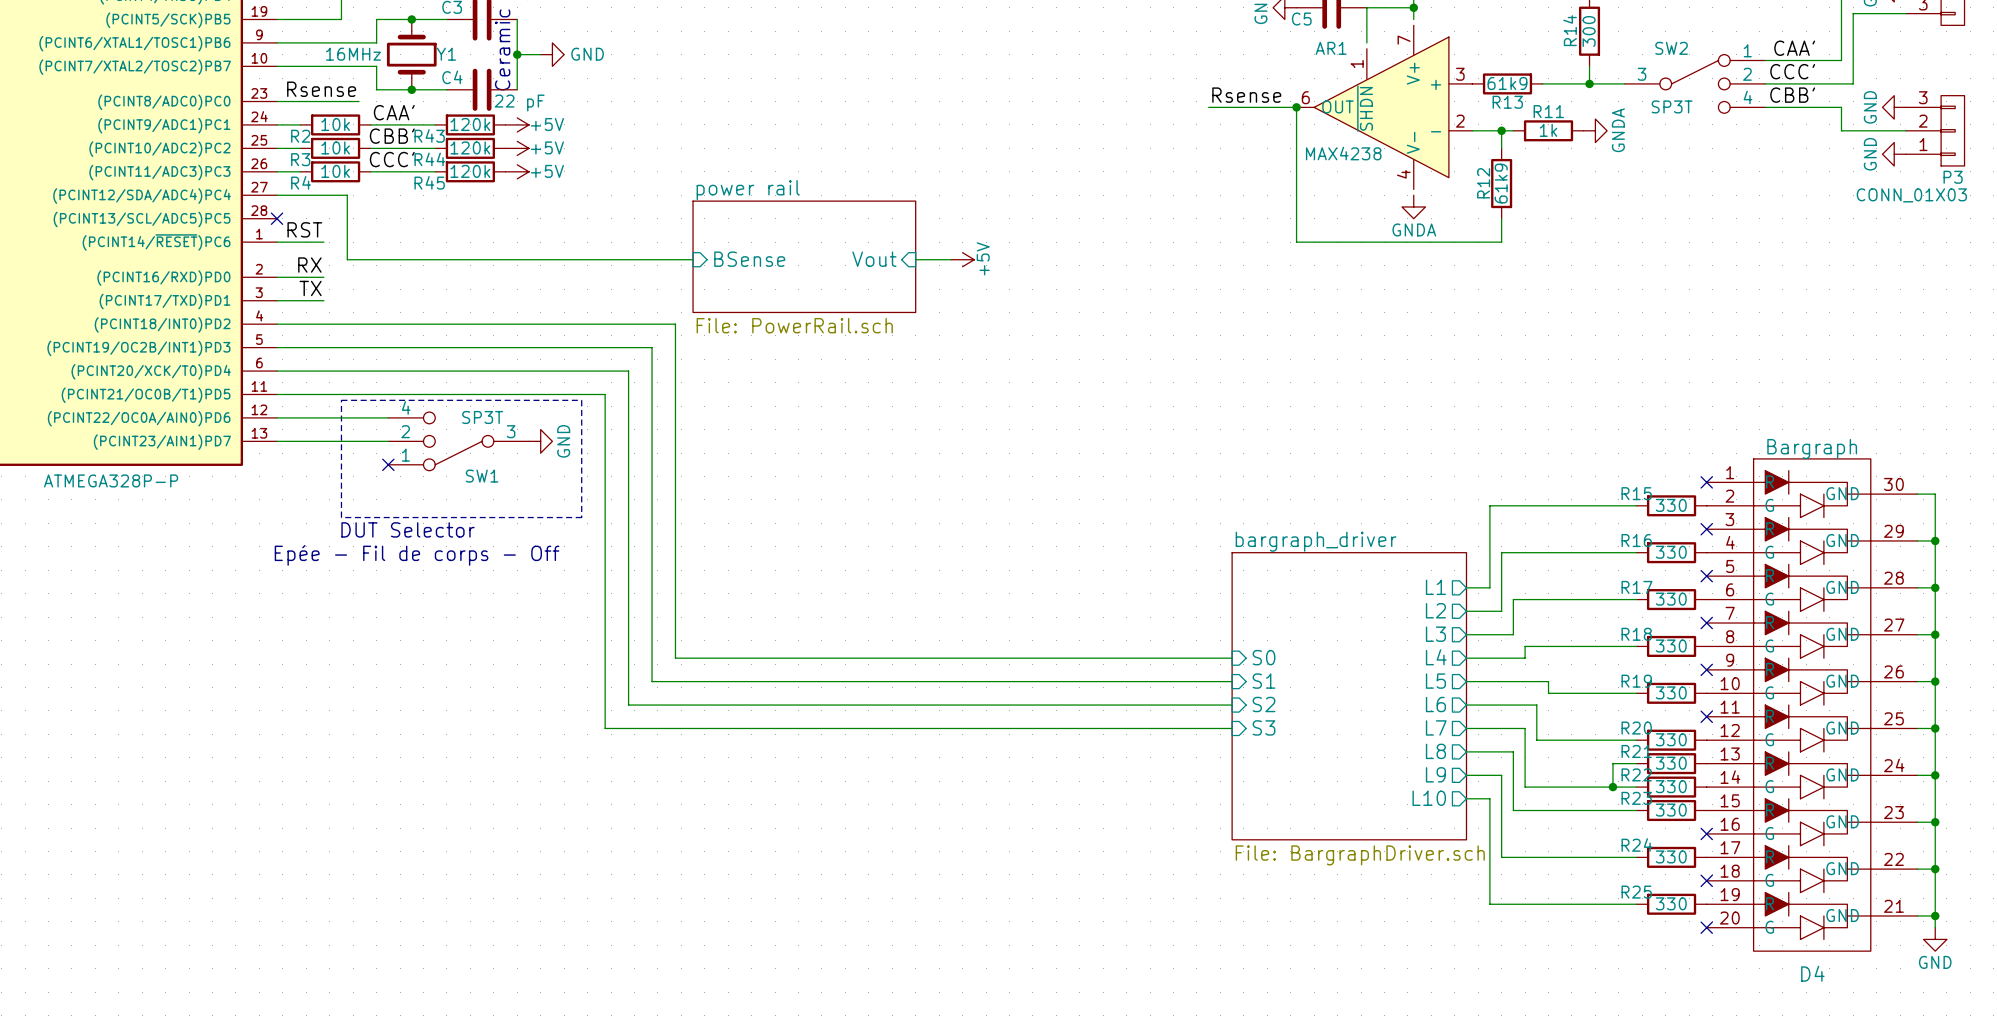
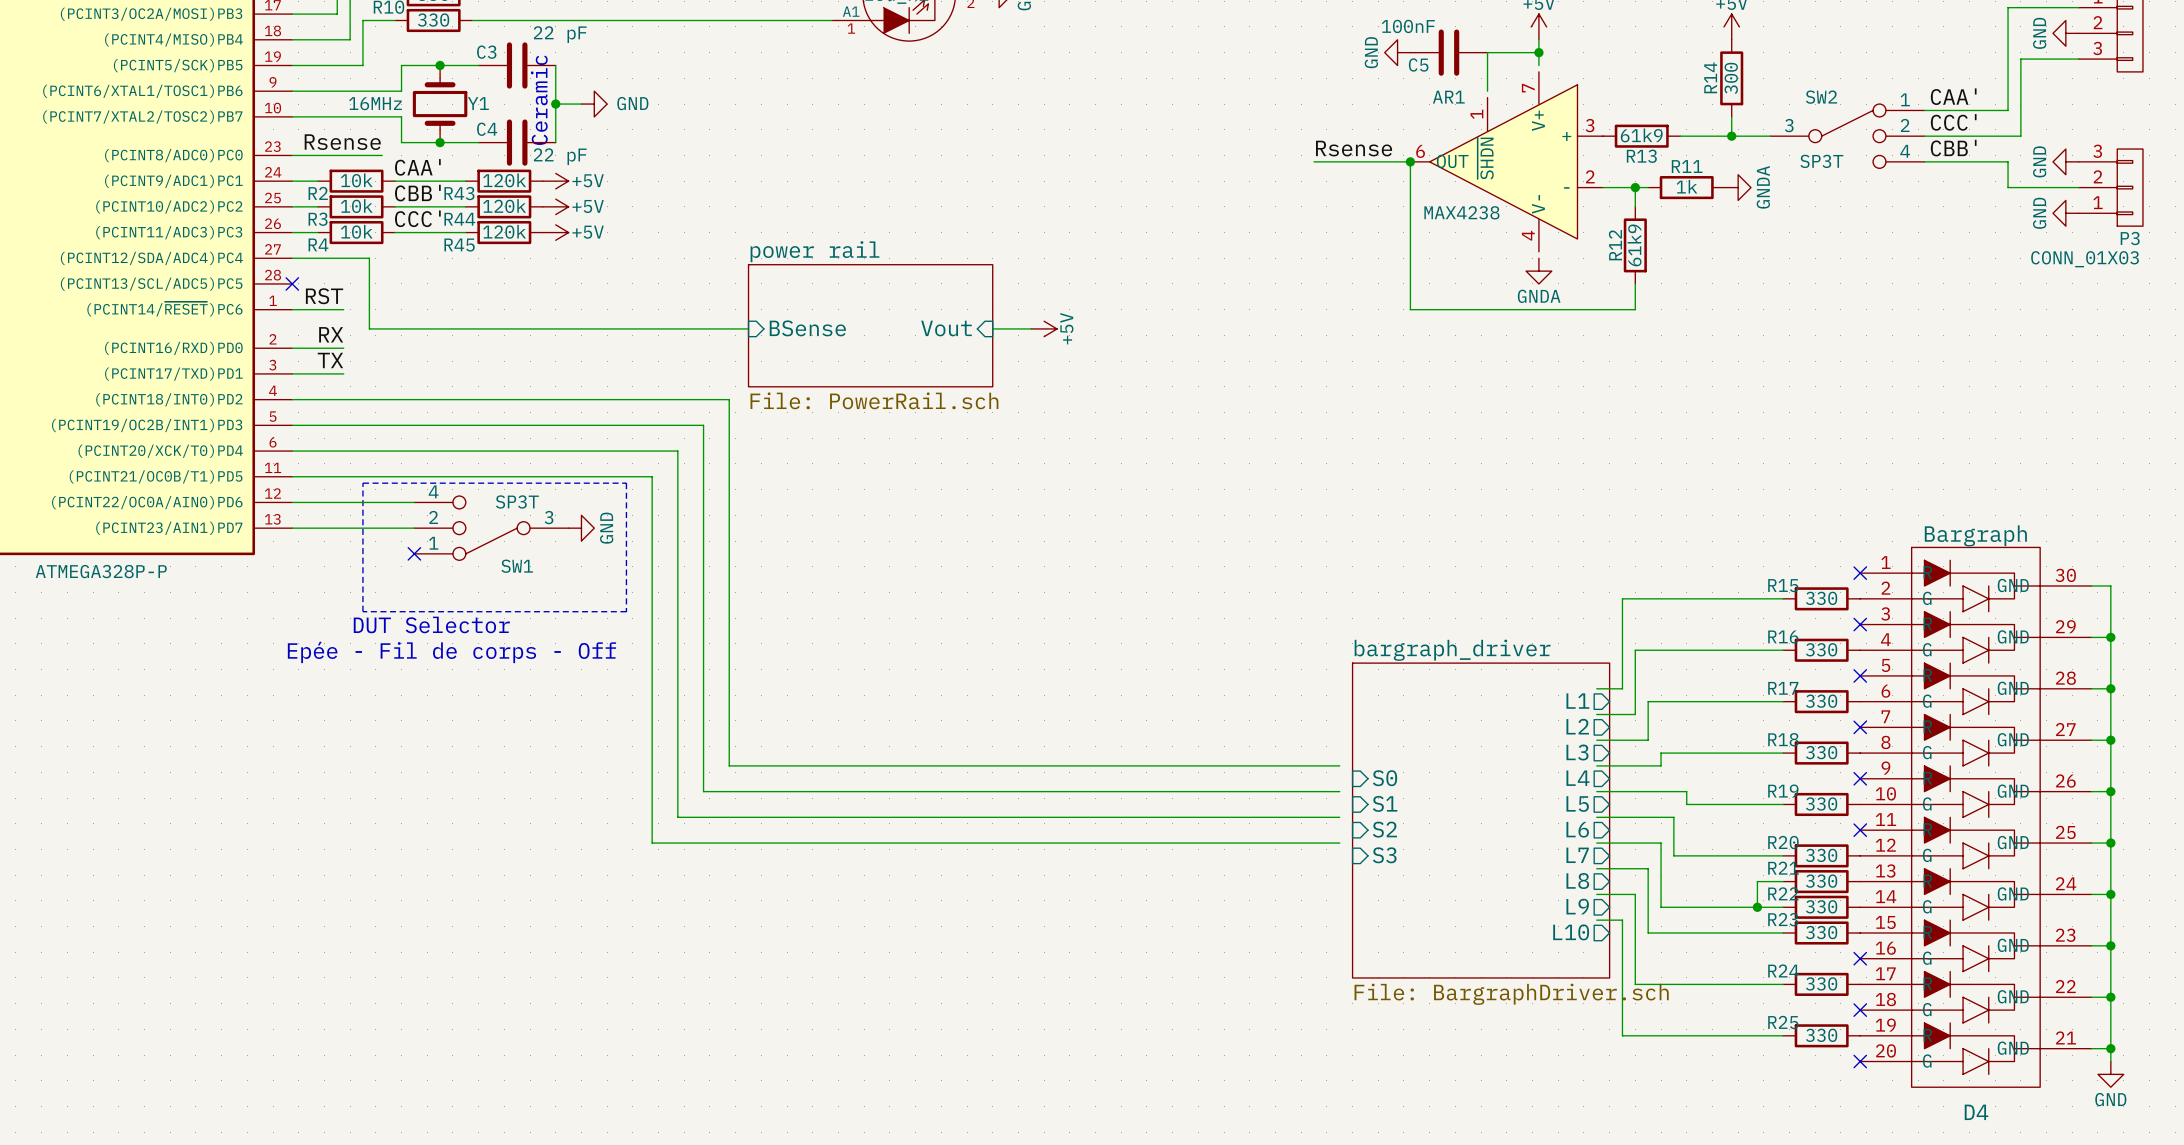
sheet pin position: L1 (1435, 587) -> L1 (1577, 701)
sheet pin position: L2 (1435, 610) -> L2 (1577, 726)
sheet pin position: L3 (1435, 634) -> L3 (1577, 752)
sheet pin position: S0 (1264, 657) -> S0 (1384, 778)
sheet pin position: L4 (1436, 657) -> L4 (1577, 778)
sheet pin position: S1 (1264, 681) -> S1 (1385, 803)
sheet pin position: L5 (1435, 681) -> L5 (1577, 804)
sheet bargraph_driver position: (1349, 696) -> (1481, 820)
sheet pin position: S2 (1264, 704) -> S2 (1384, 829)
sheet pin position: L6 (1435, 704) -> L6 (1577, 829)
sheet pin position: S3 (1264, 727) -> S3 (1384, 855)
sheet pin position: L7 (1436, 727) -> L7 (1577, 855)
sheet pin position: L8 (1435, 751) -> L8 (1577, 881)
sheet pin position: L9 (1435, 774) -> L9 (1577, 906)
sheet pin position: L10 (1429, 798) -> L10 (1571, 932)

